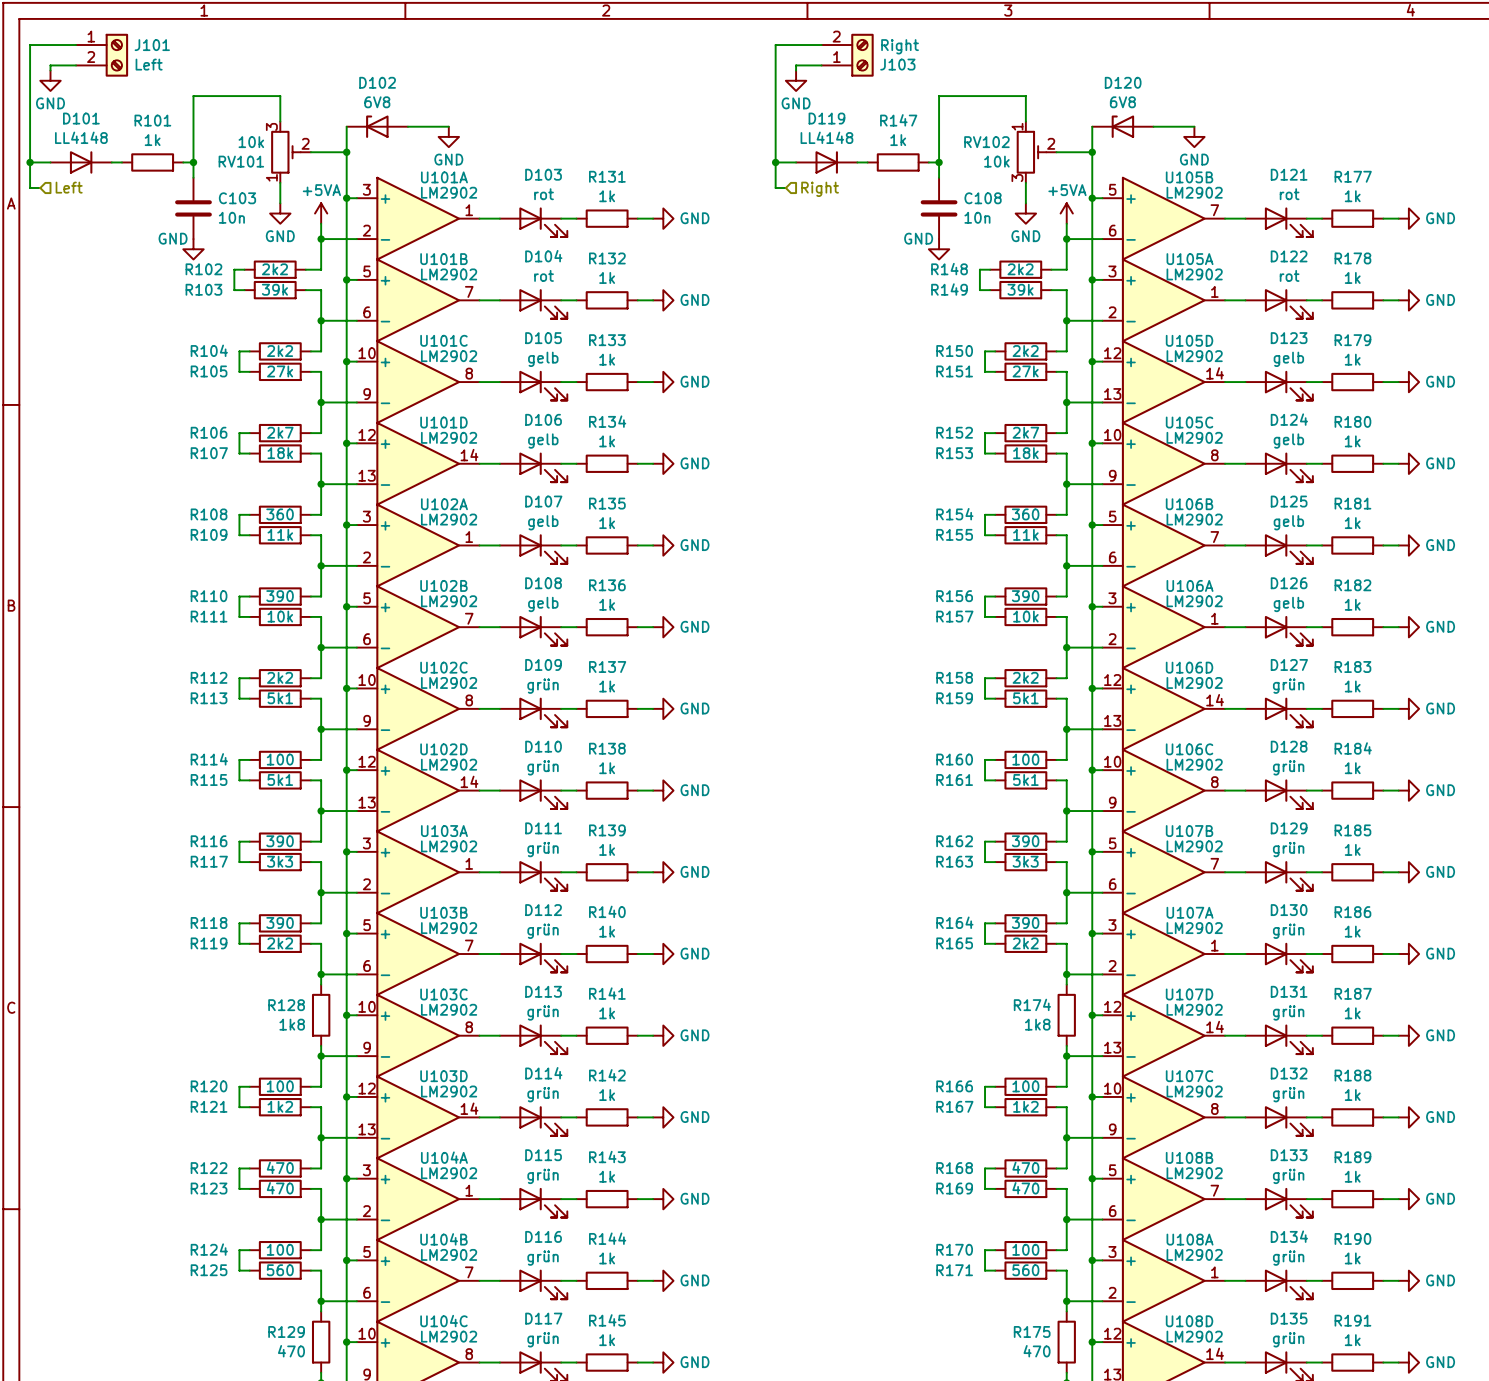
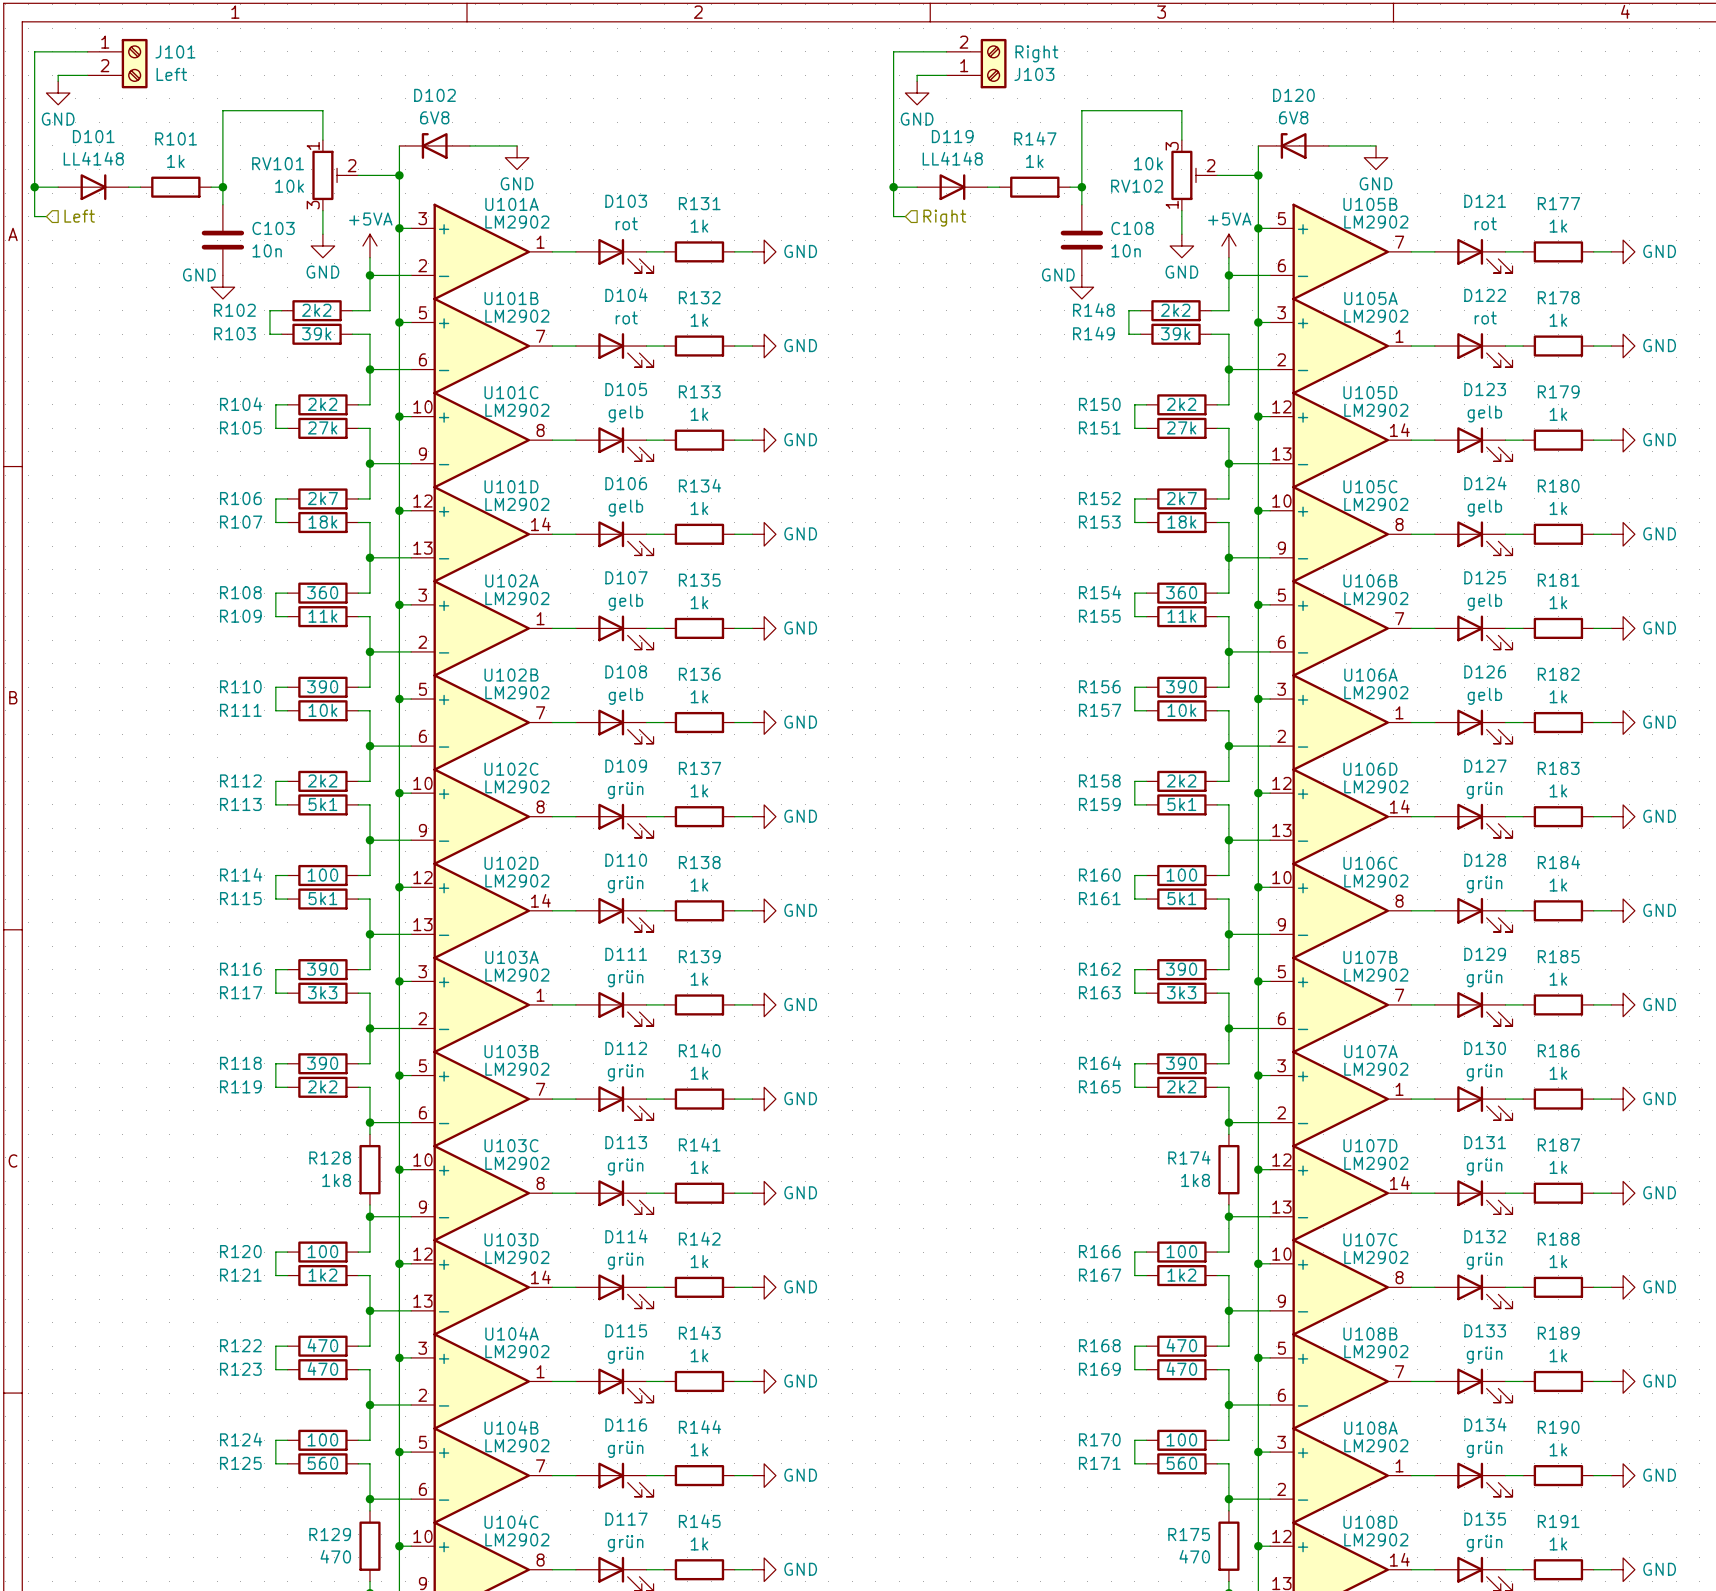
RV101 flip: as is (285, 152) -> up-down (329, 175)
RV102 flip: as is (1031, 152) -> up-down (1188, 175)

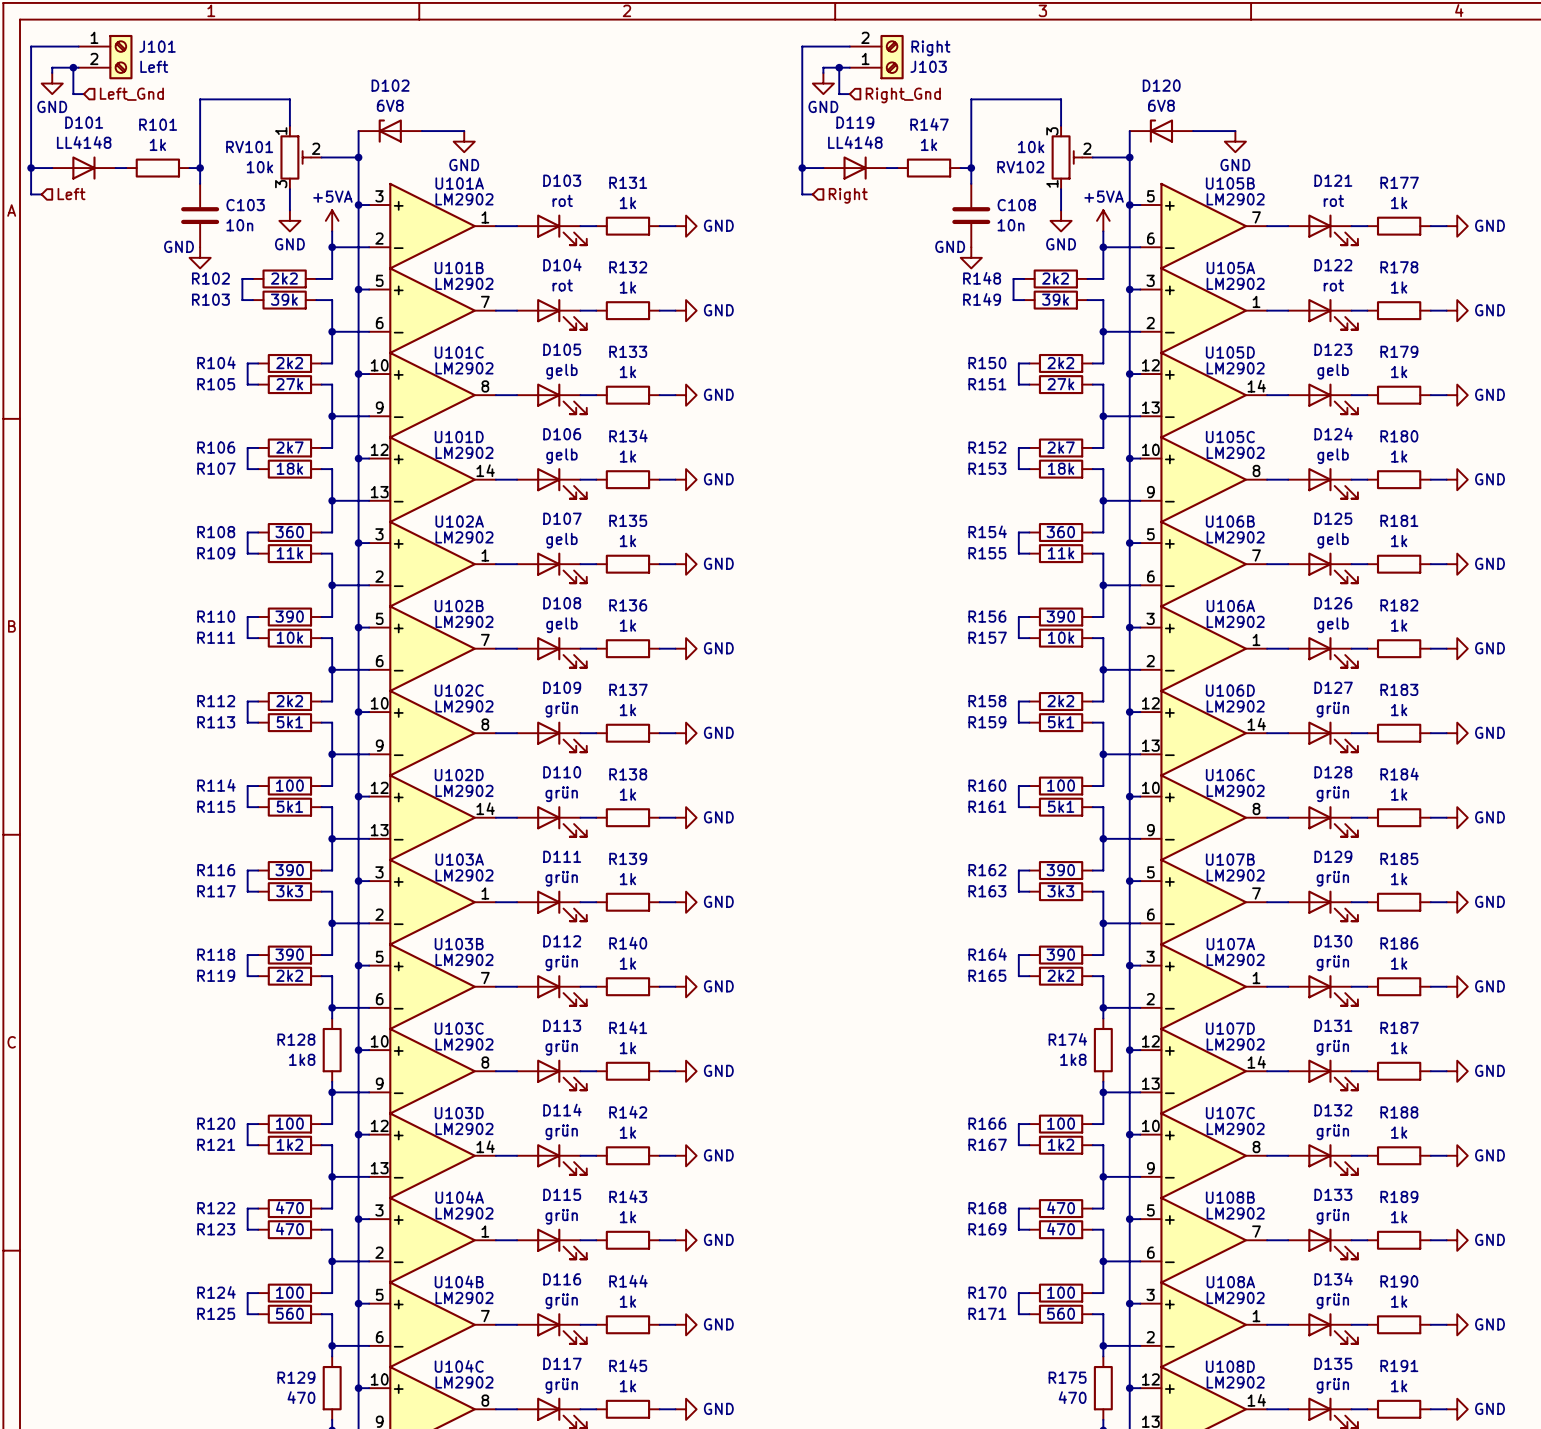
wire: none -> (73, 67) (73, 94) (83, 94)
junction: none -> (73, 67)
wire: none -> (839, 67) (839, 94) (849, 94)
junction: none -> (839, 67)
hierarchical label: none -> Left_Gnd (131, 94)
hierarchical label: none -> Right_Gnd (903, 95)

